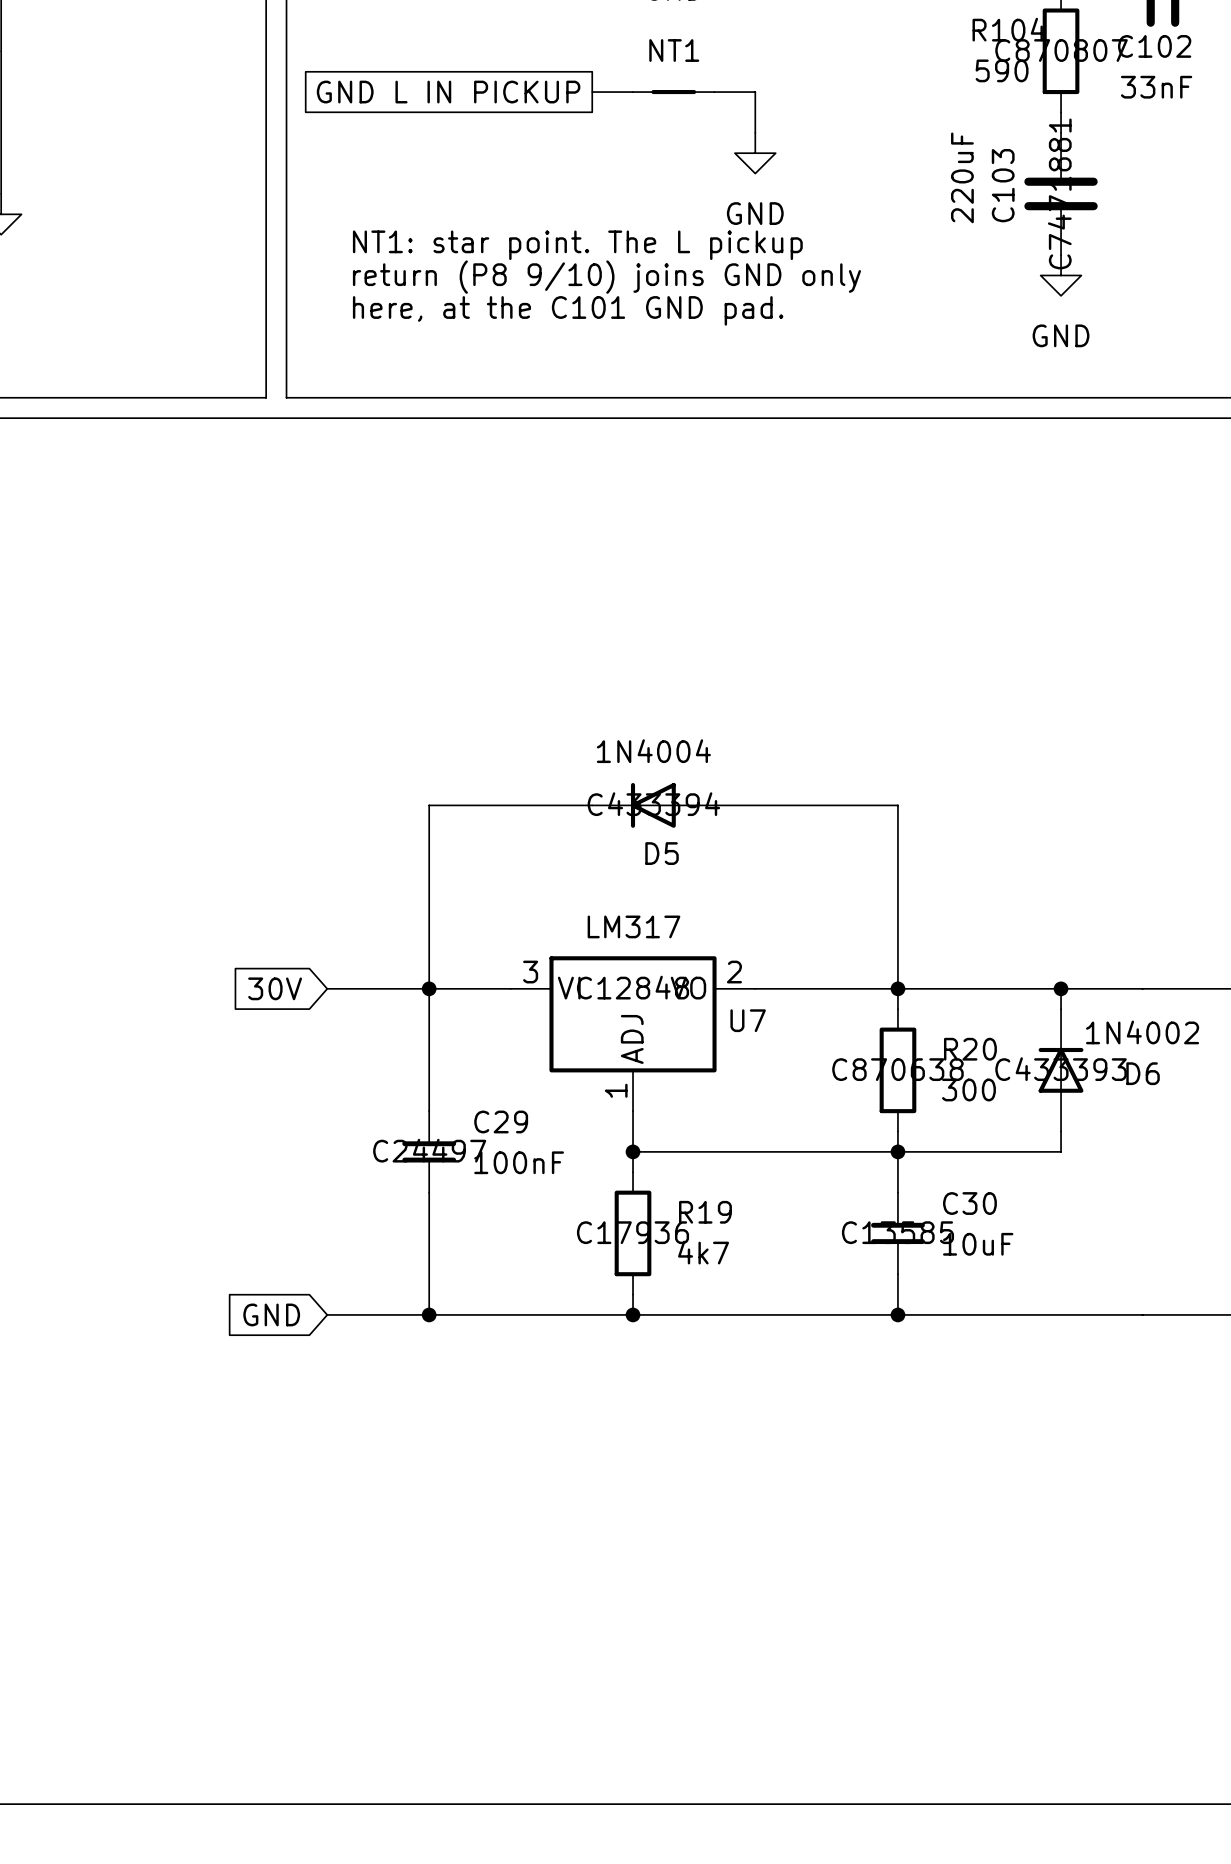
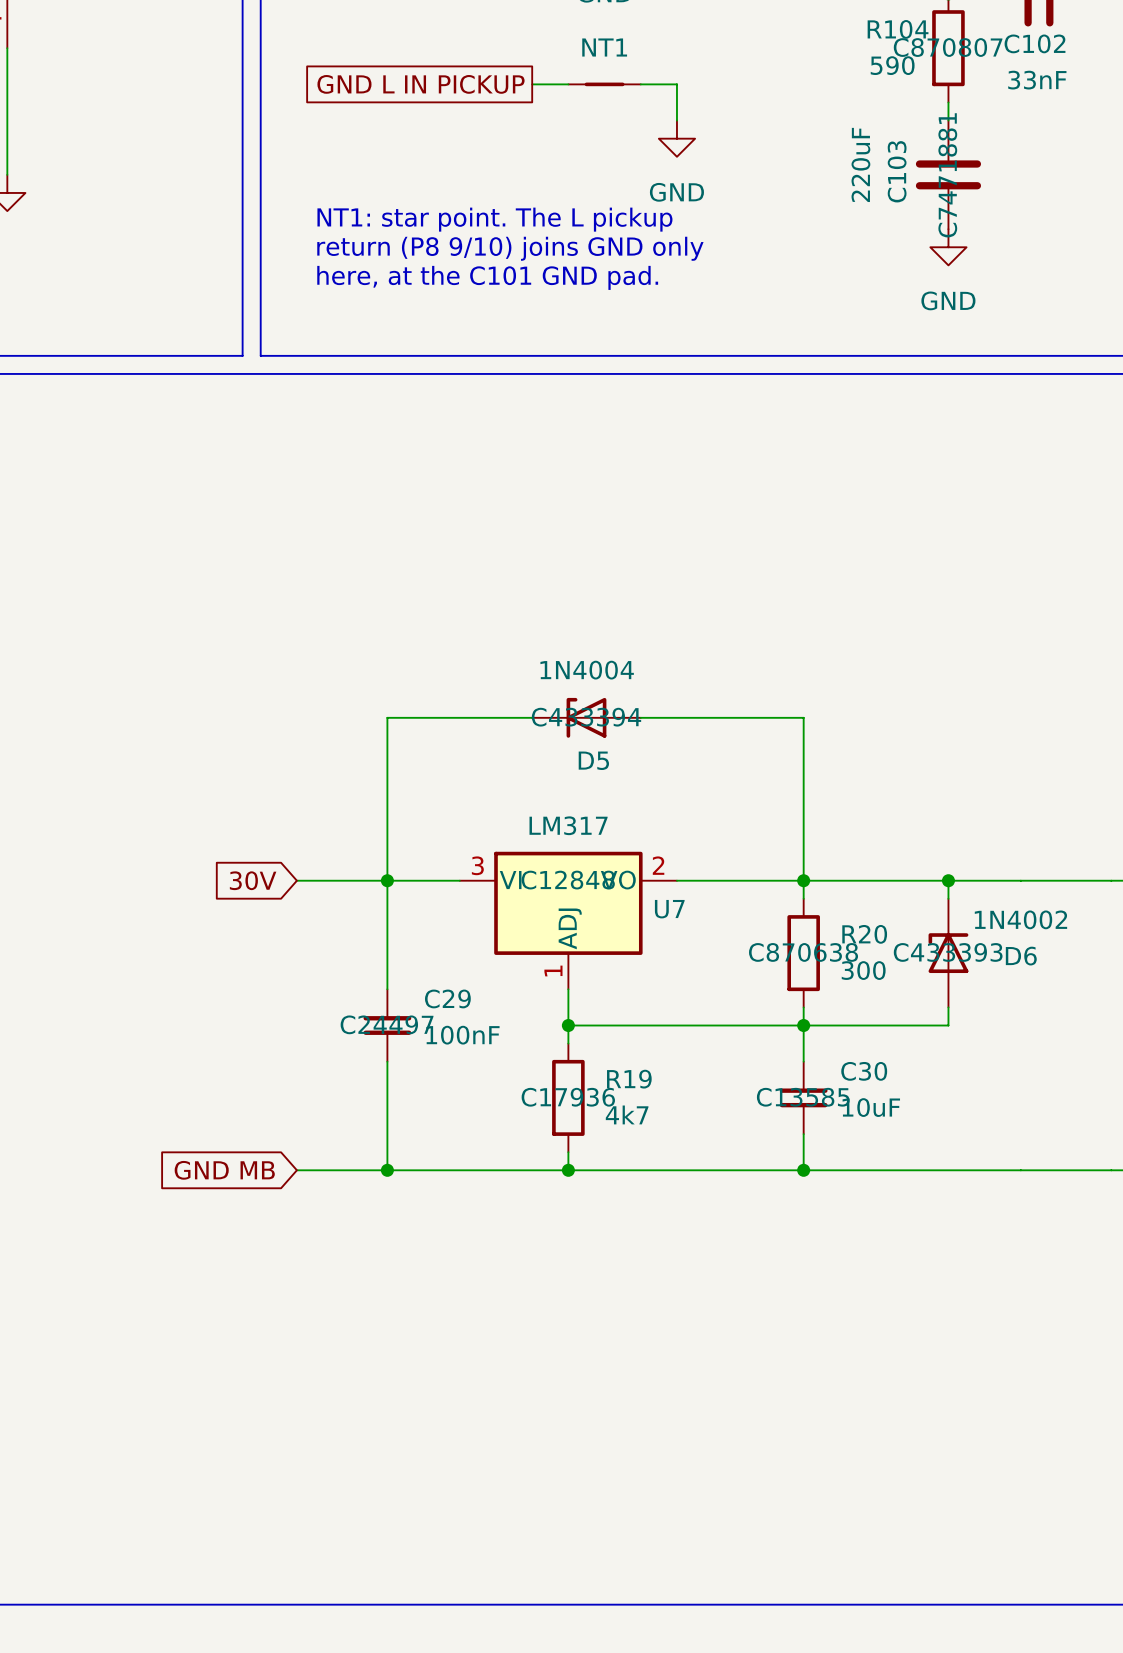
D5 symbol: [592, 782, 715, 828] -> [532, 697, 641, 738]
D6 symbol: [1038, 1009, 1084, 1132] -> [928, 898, 969, 1008]
global label: GND (271, 1314) -> GND MB (224, 1170)

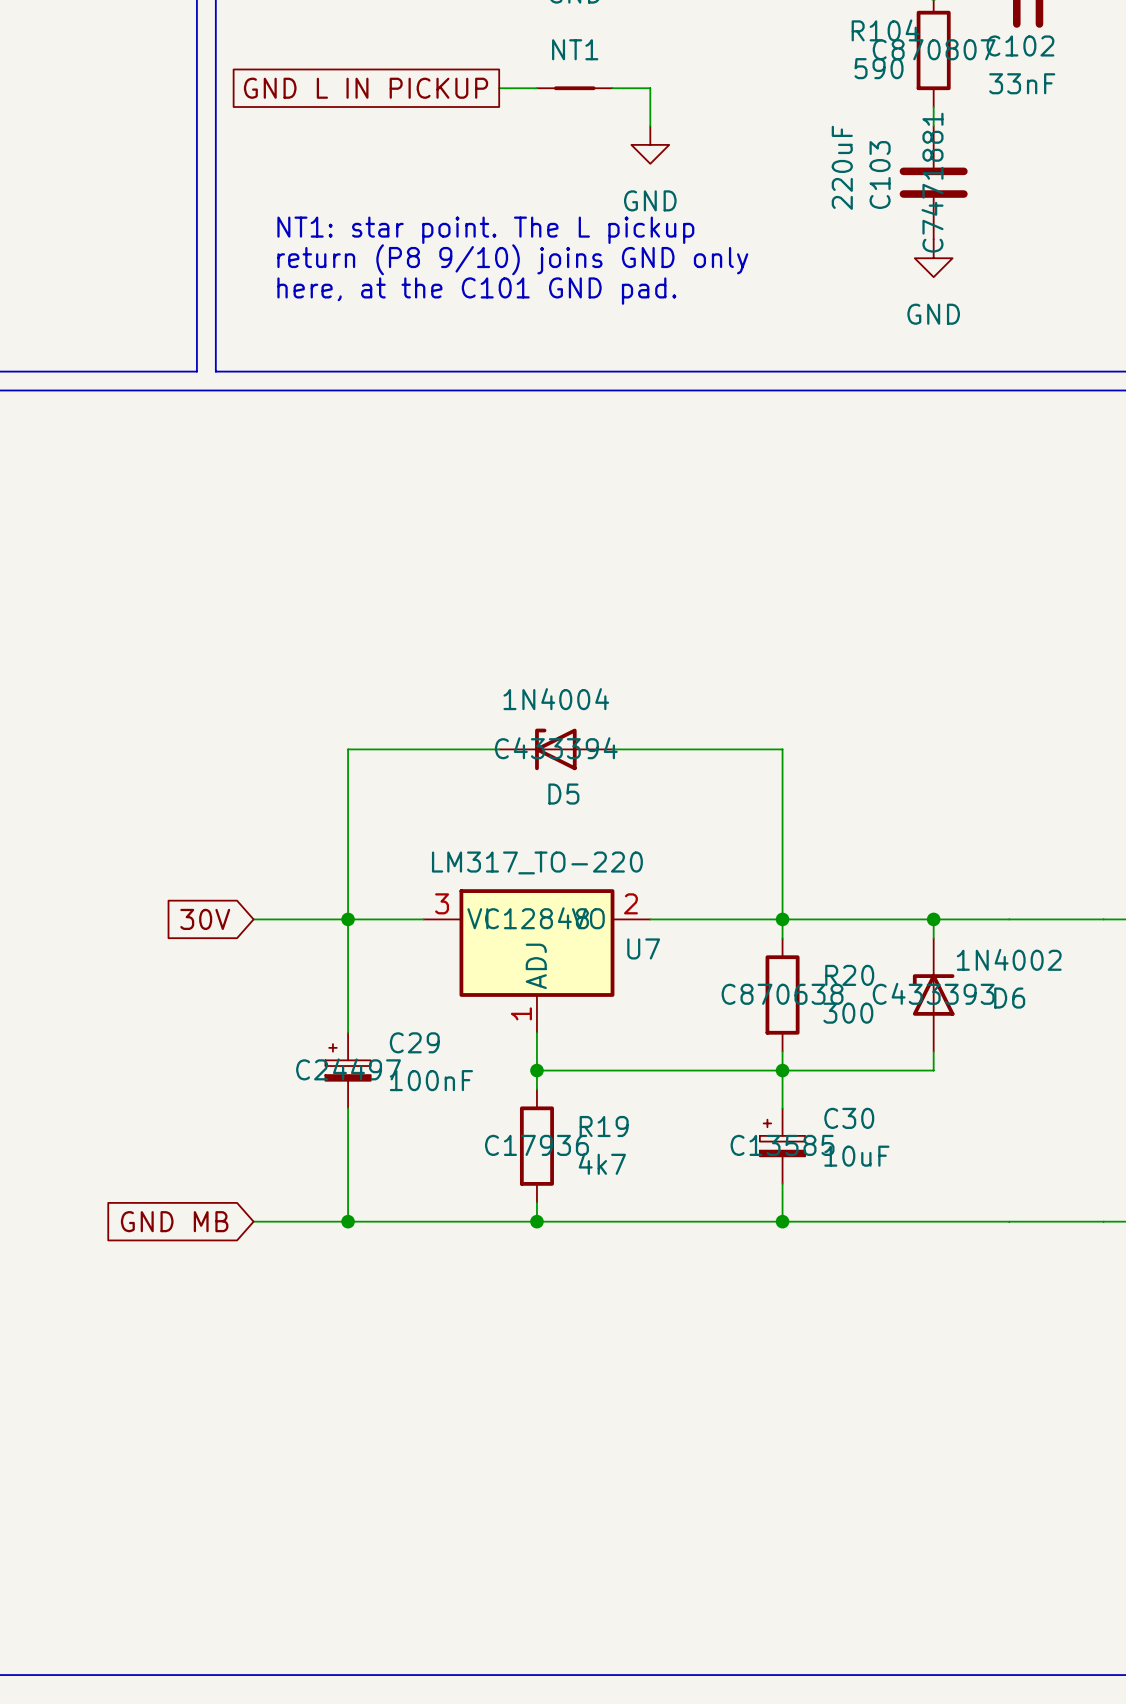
U7 value: LM317 (568, 825) -> LM317_TO-220 (537, 862)
C29 symbol: [363, 989, 412, 1062] -> [325, 1032, 371, 1109]
C30 symbol: [779, 1061, 828, 1135] -> [759, 1108, 806, 1184]

